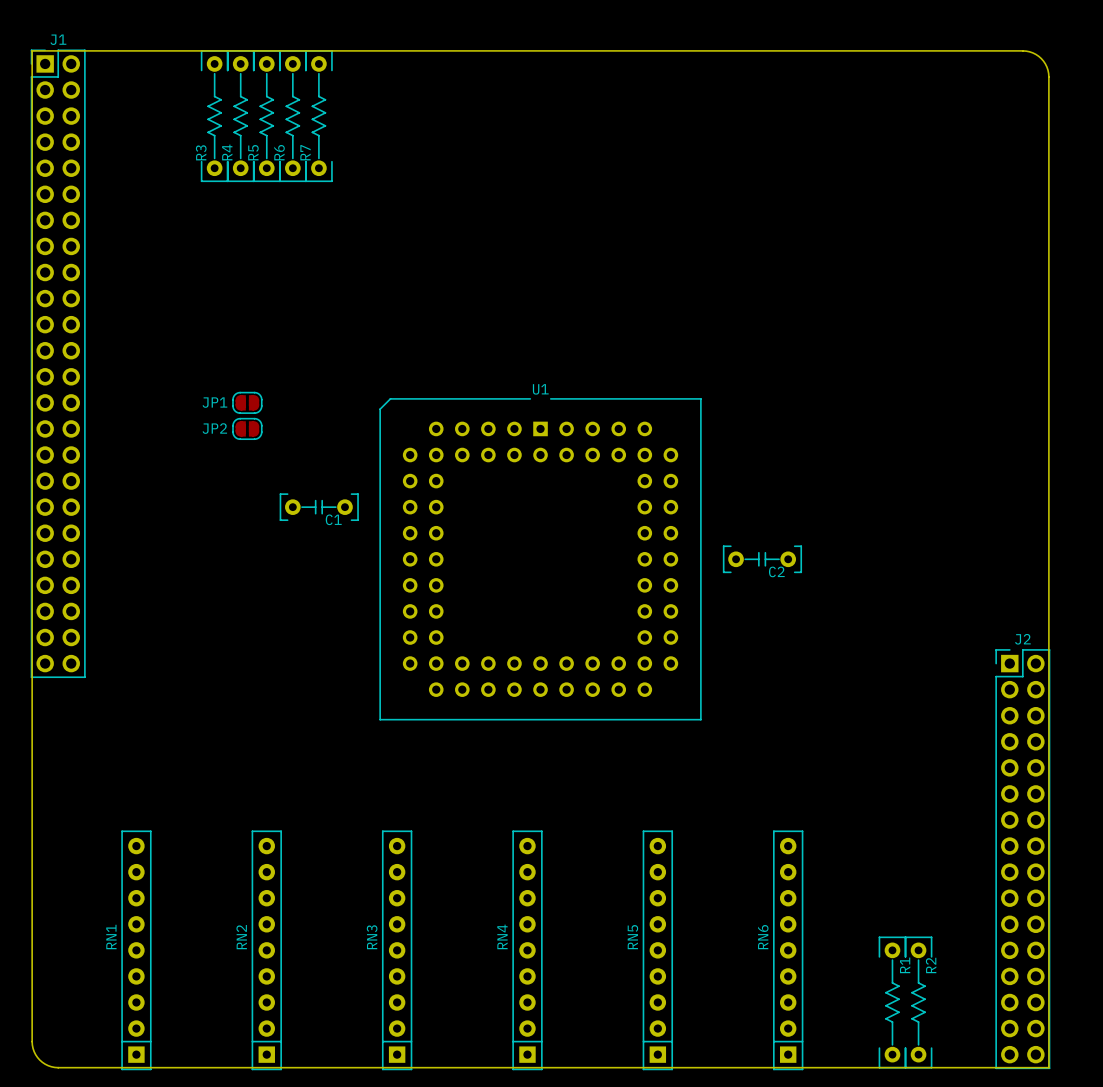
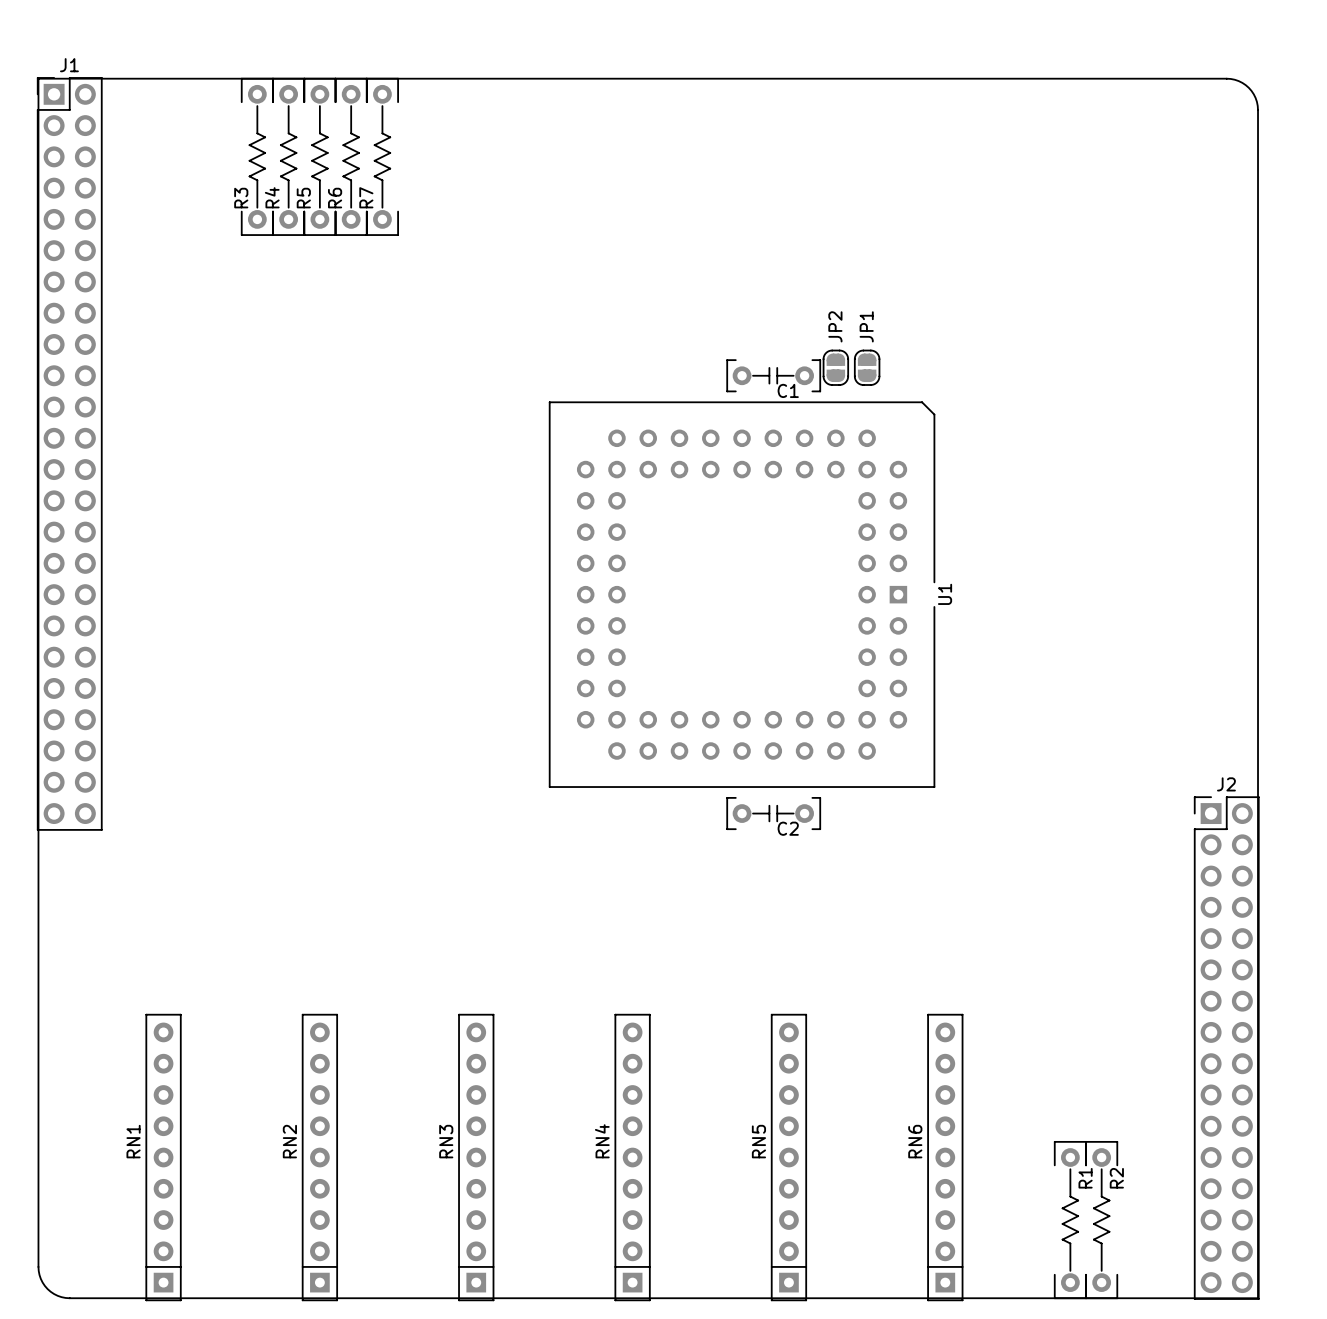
JP1 rotation: 0° (247, 402) -> 90° clockwise (867, 367)
JP1 position: (247, 402) -> (867, 367)
JP2 rotation: 0° (247, 428) -> 90° clockwise (835, 367)
JP2 position: (247, 428) -> (835, 367)
C1 position: (319, 507) -> (773, 375)
U1 rotation: 0° (540, 559) -> 90° clockwise (742, 594)
C2 position: (762, 559) -> (773, 813)

